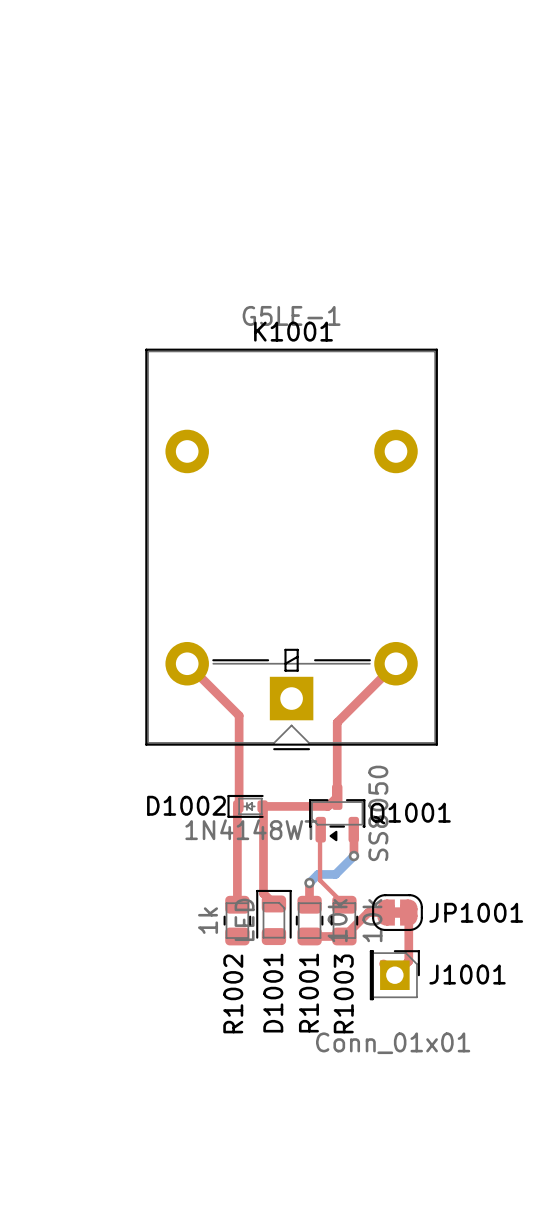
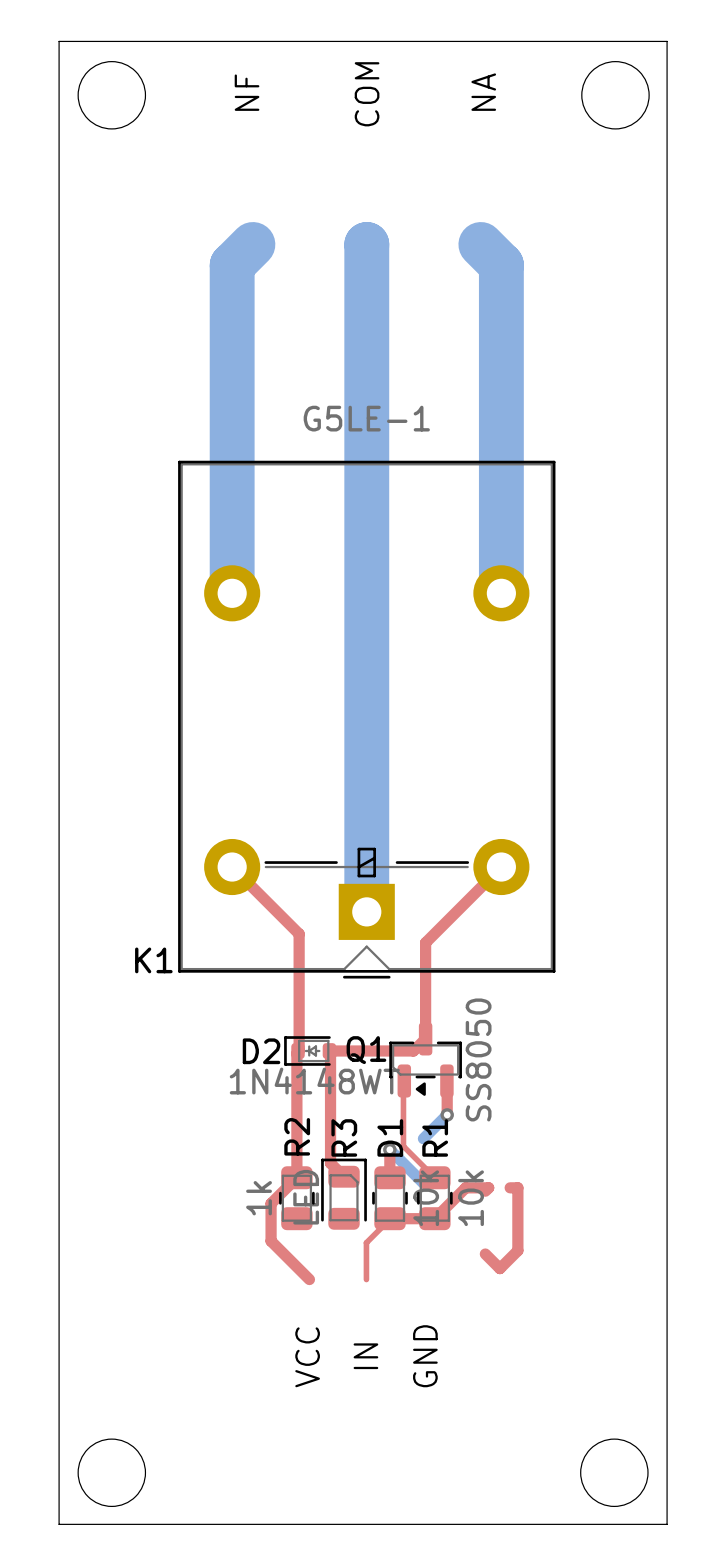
board edge: none -> (59, 41) (667, 41) (667, 1524) (59, 1524) (59, 41)
round board edge: none -> [77, 61, 147, 130]
round board edge: none -> [581, 61, 650, 130]
text: none -> NA (483, 92)
text: none -> NF (247, 92)
text: none -> COM (367, 94)
bottom track: none -> (252, 244) (232, 265) (232, 593)
bottom track: none -> (366, 244) (366, 911)
bottom track: none -> (480, 244) (501, 264) (501, 593)
K1001 name: K1001 (293, 331) -> K1 (153, 960)
D1002 name: D1002 (186, 805) -> D2 (261, 1051)
Q1001 name: Q1001 (410, 813) -> Q1 (366, 1050)
bottom track: (335, 874) (318, 874) (309, 883) -> (423, 1183) (389, 1149)
top track: none -> (296, 1177) (271, 1203) (271, 1241) (309, 1279)
JP1001: (397, 912) -> none
top track: none -> (389, 1219) (366, 1242) (366, 1279)
J1001: Conn_01x01 (394, 975) -> none
R1002 name: R1002 (233, 993) -> R2 (297, 1136)
D1001 name: D1001 (273, 993) -> D1 (390, 1137)
R1001 name: R1001 (308, 993) -> R3 (344, 1137)
R1003 name: R1003 (343, 993) -> R1 (435, 1137)
text: none -> VCC (307, 1357)
text: none -> IN (365, 1356)
text: none -> GND (425, 1356)
round board edge: none -> [77, 1438, 147, 1507]
round board edge: none -> [580, 1438, 649, 1507]

